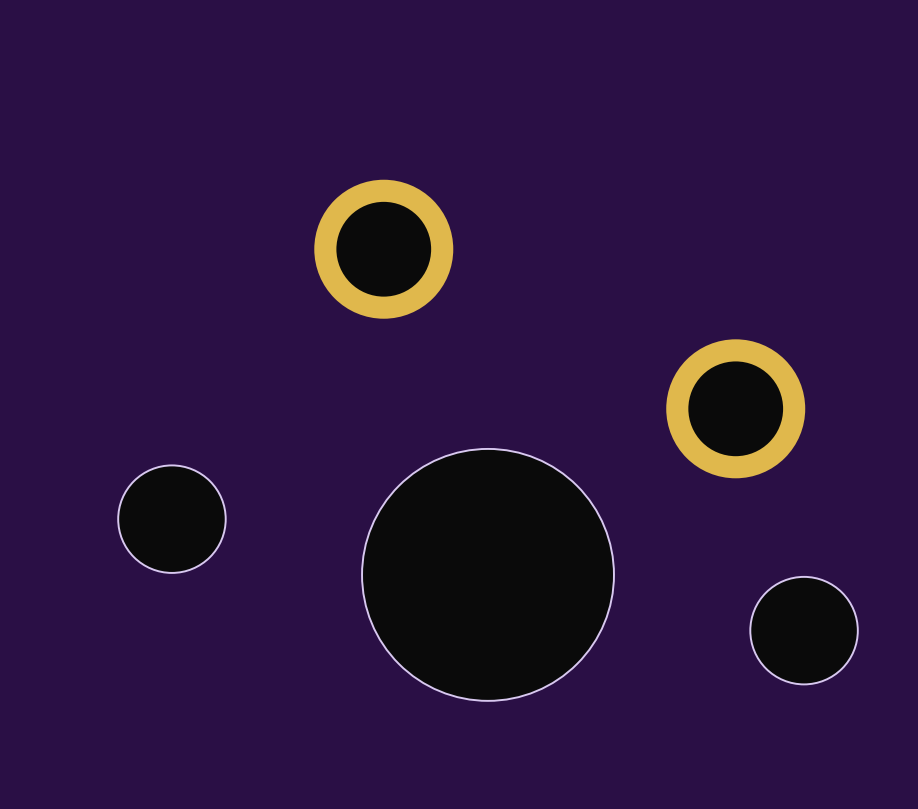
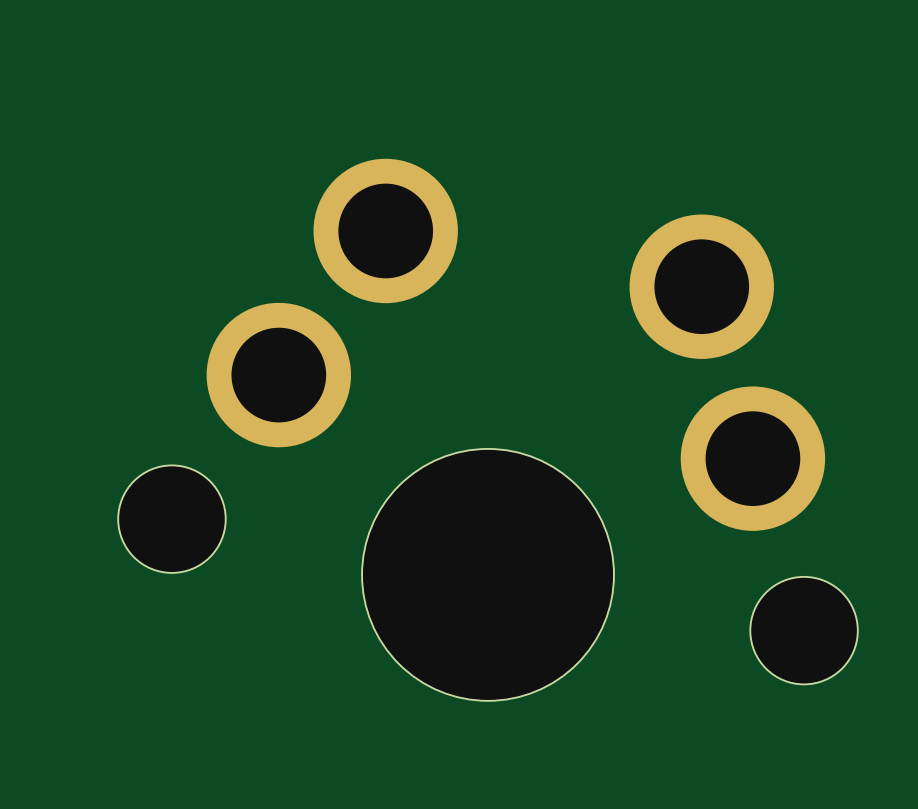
part footprint: [118, 179, 858, 701] -> [118, 158, 858, 701]

